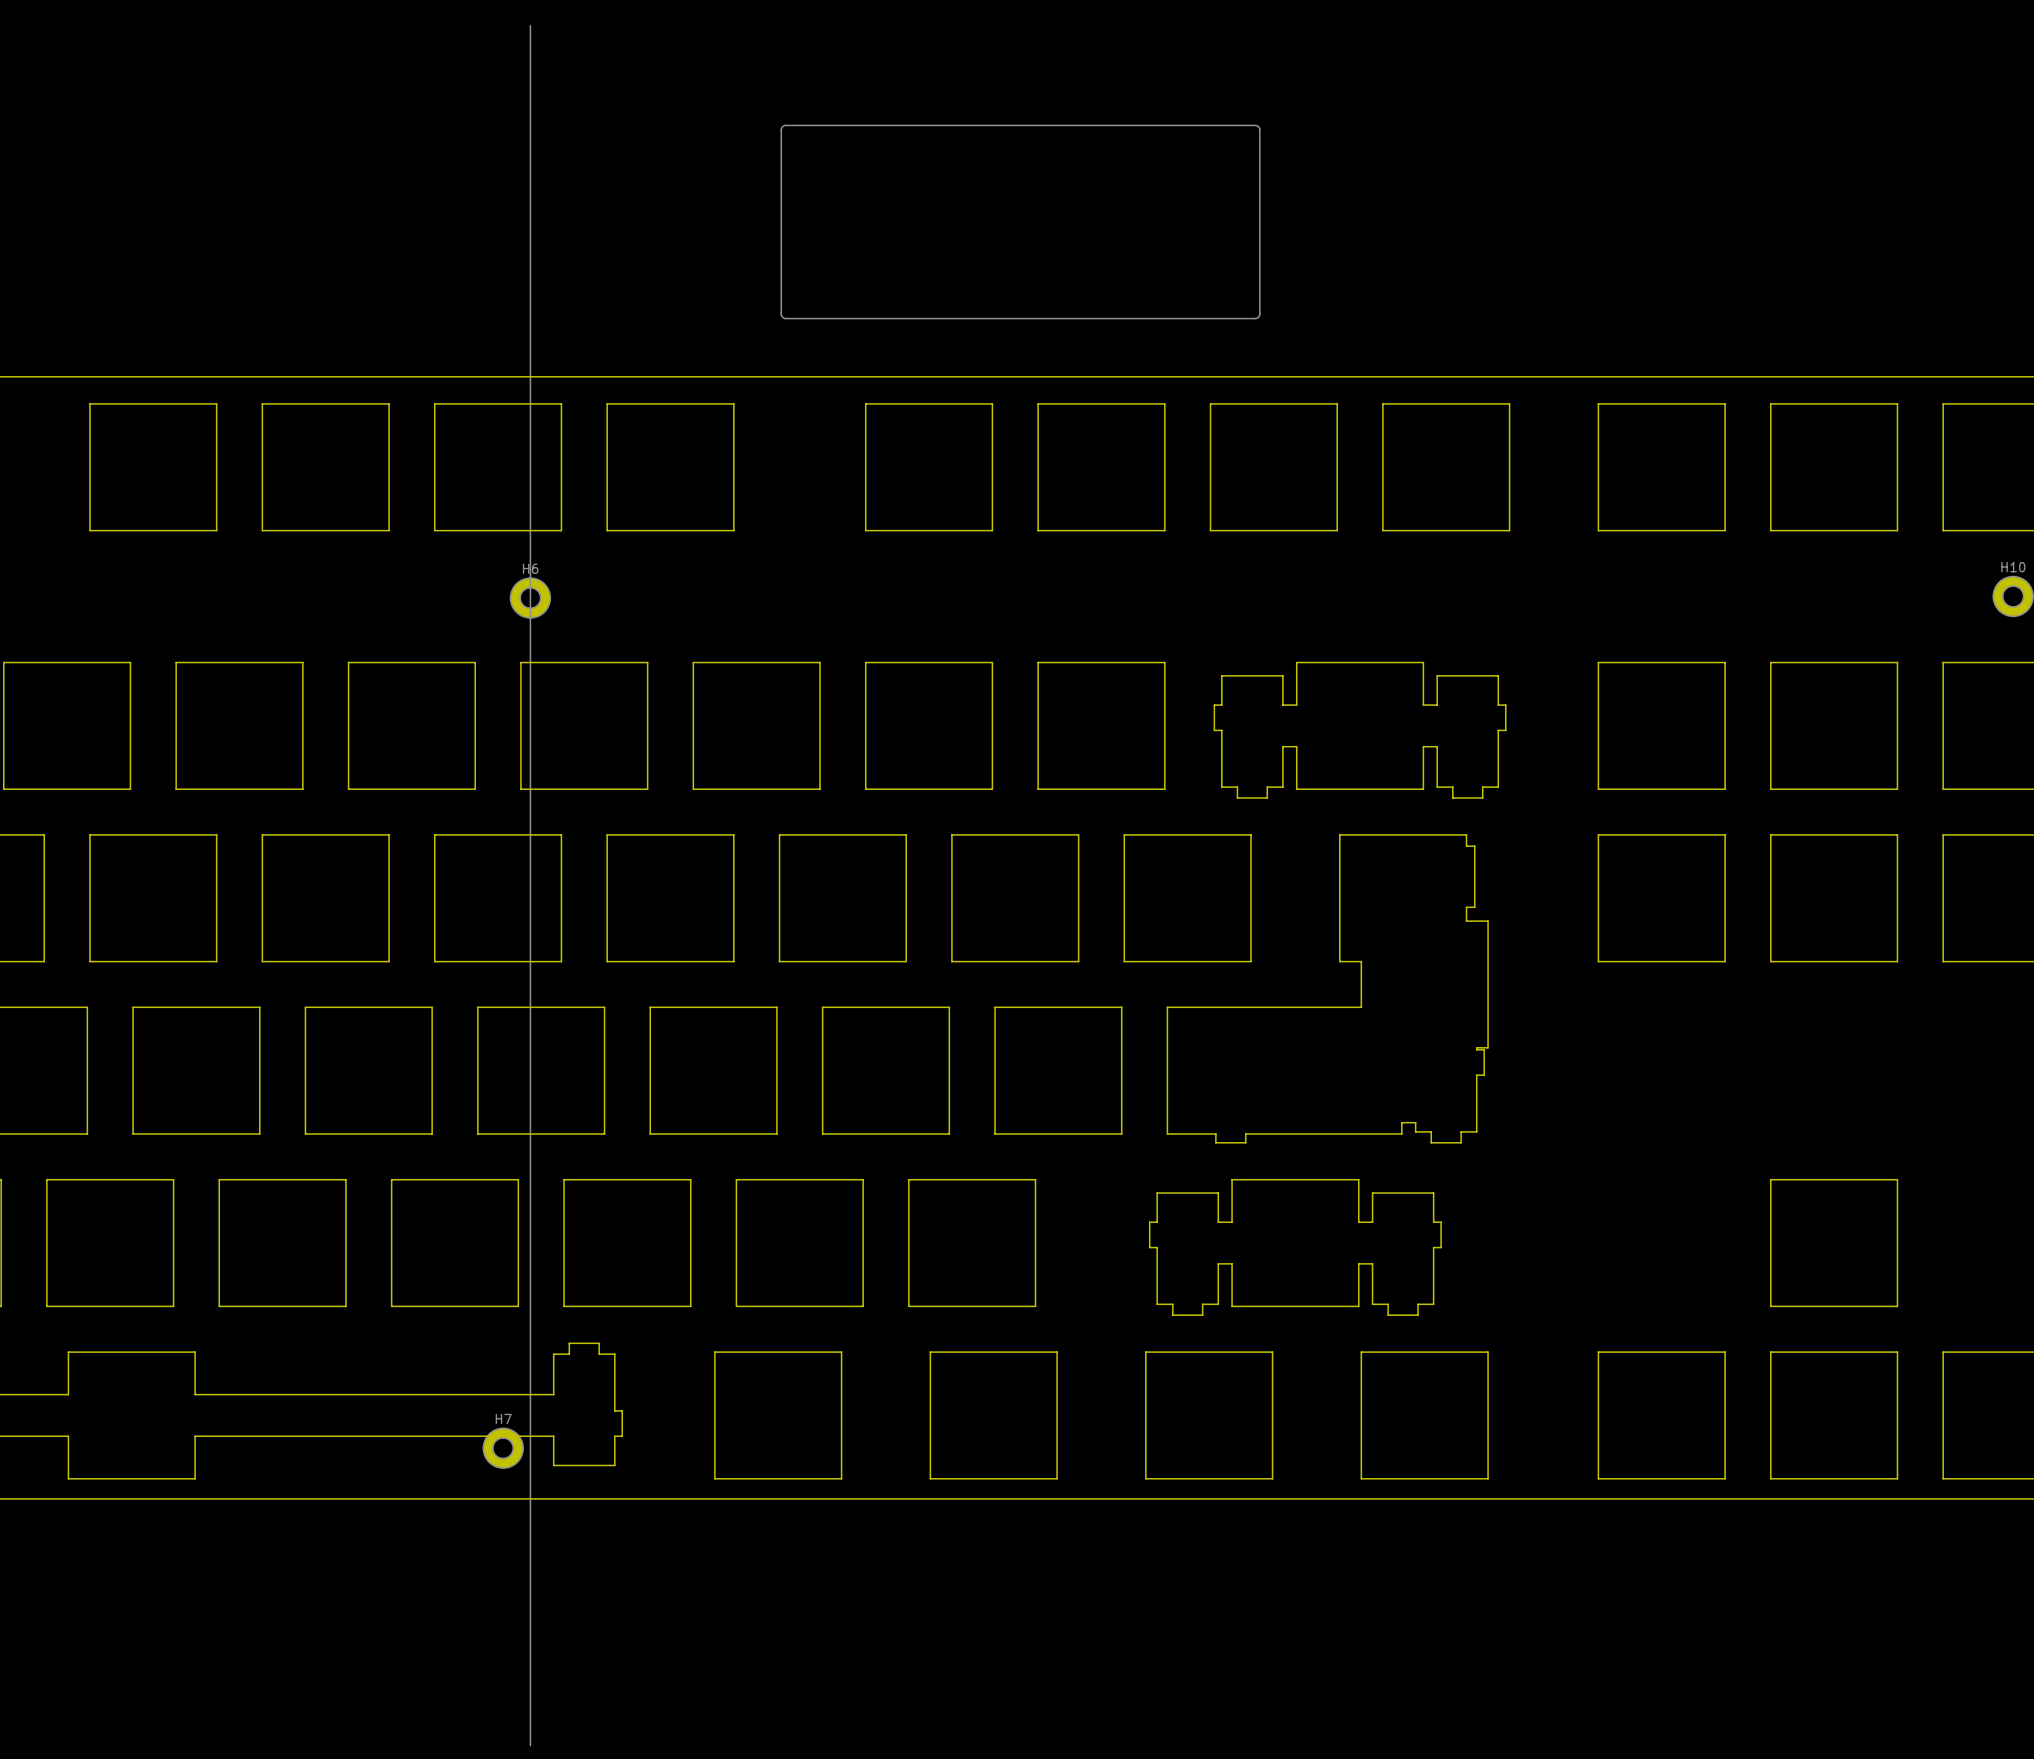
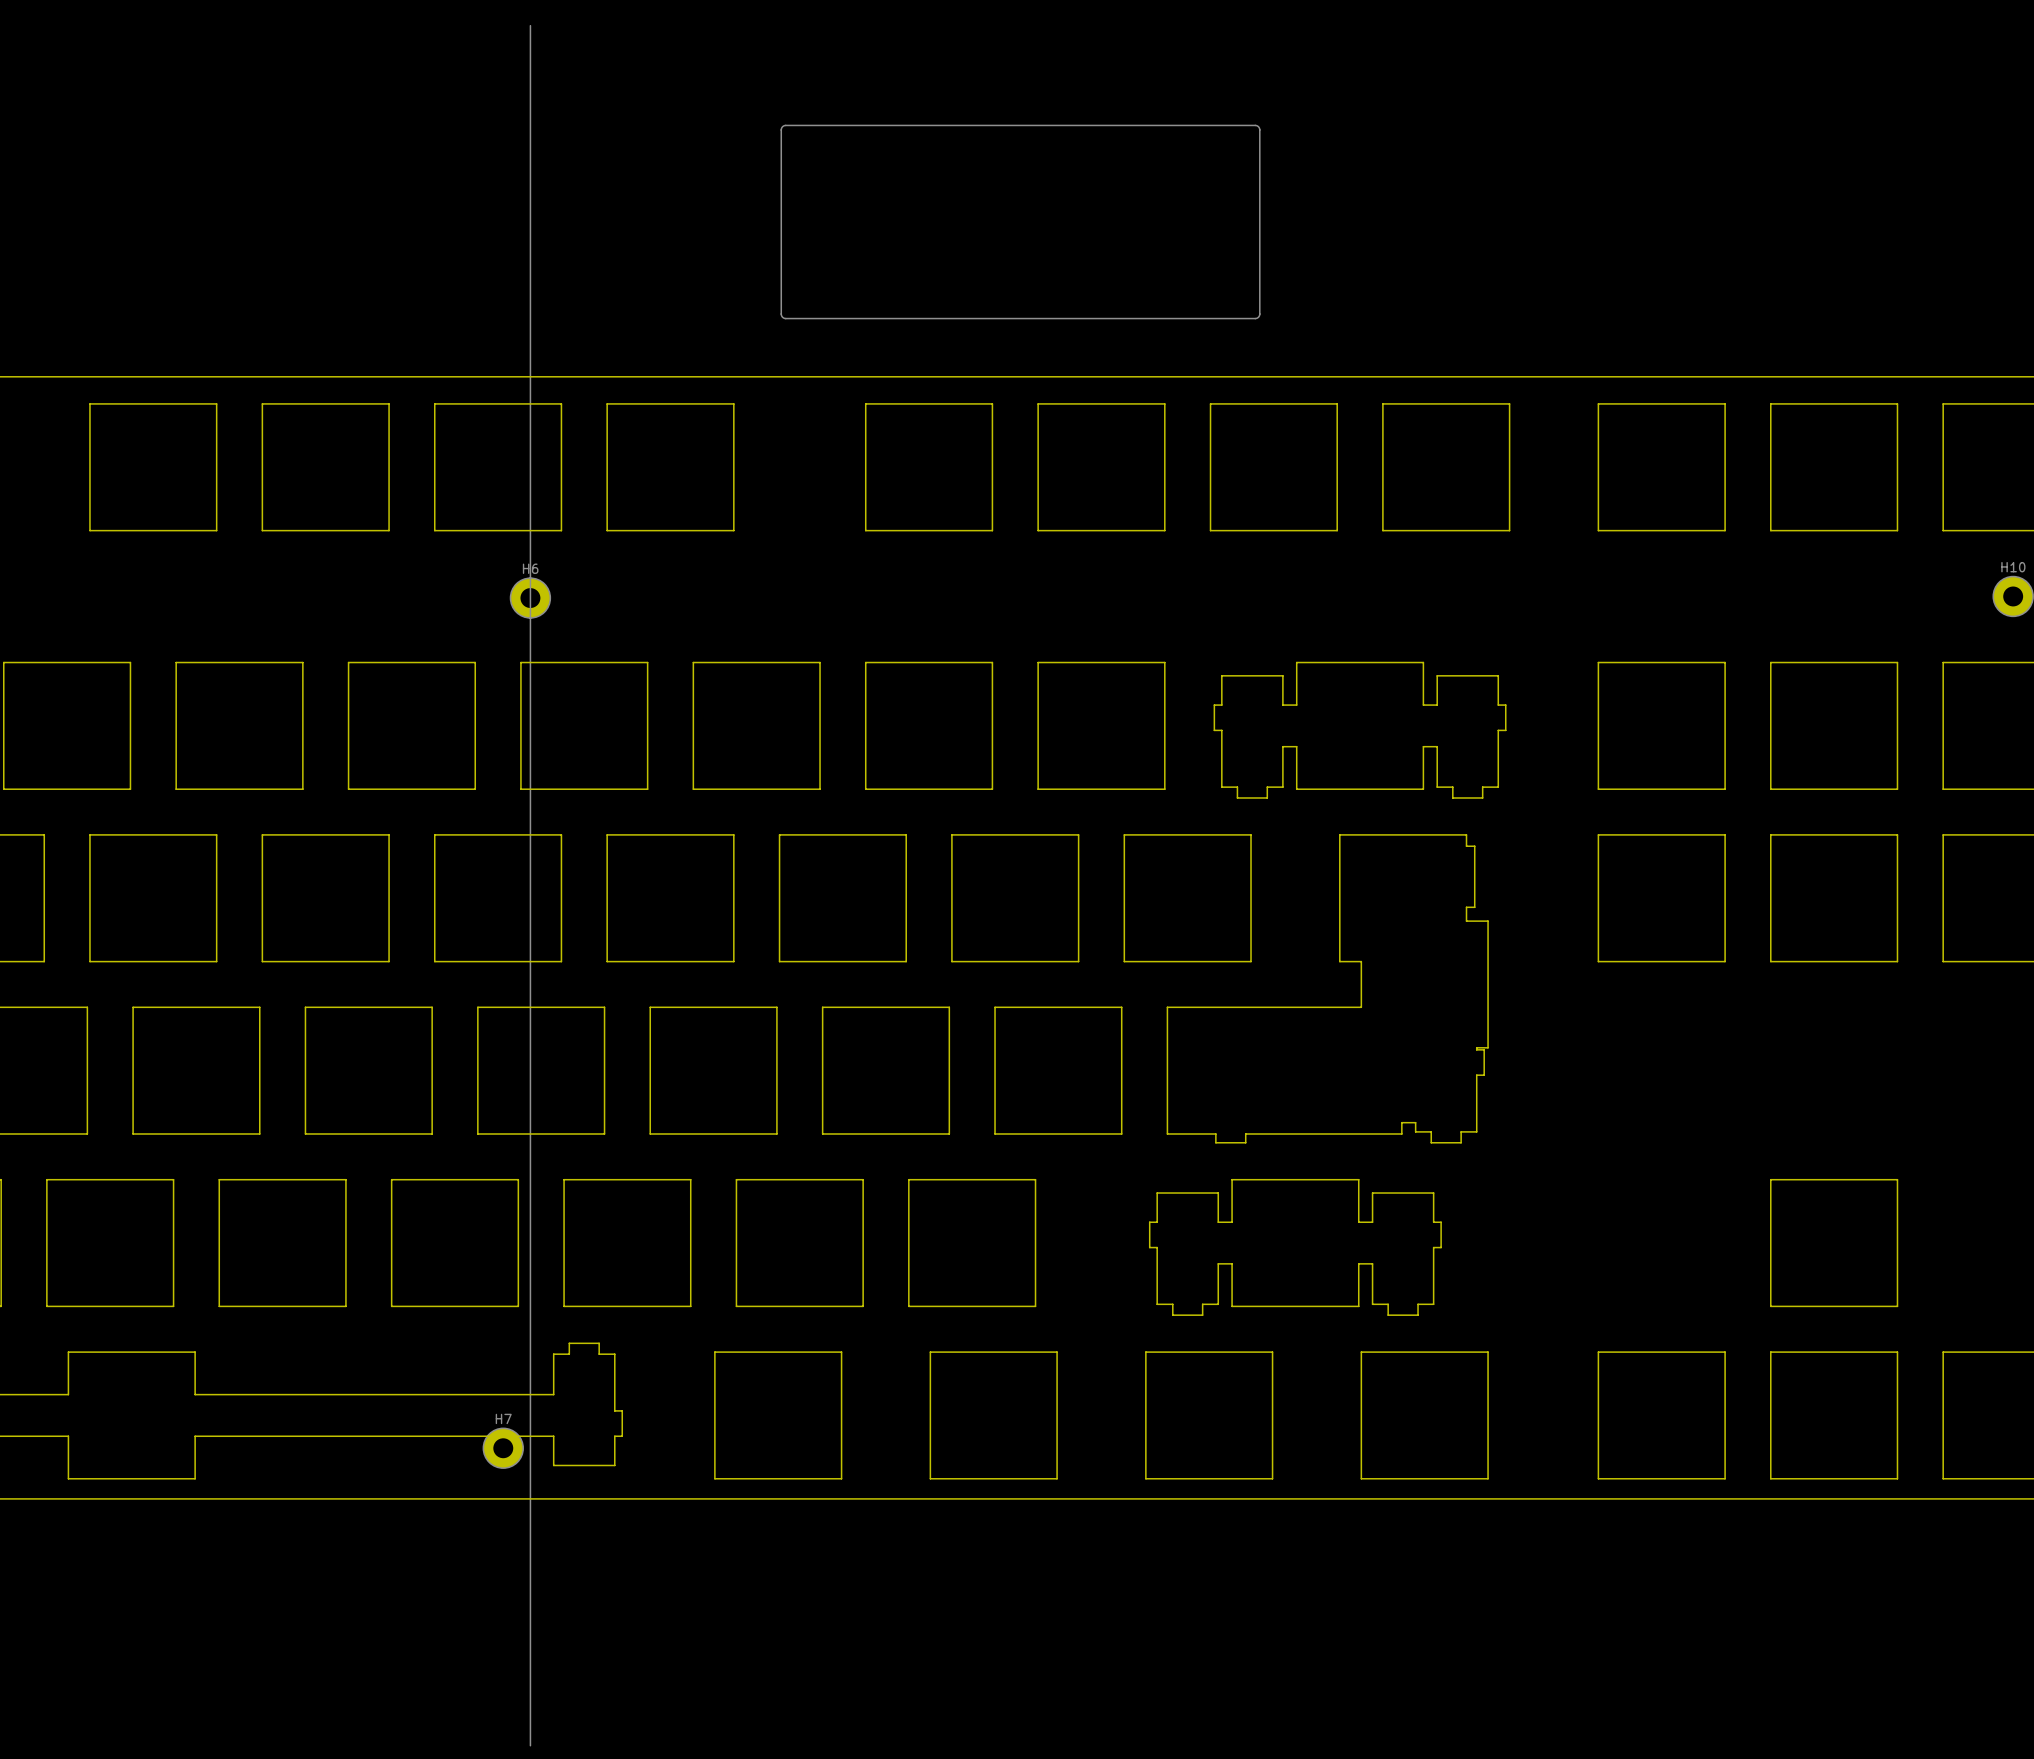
drawing: [2002, 585, 2025, 608] -> none
drawing: [519, 587, 542, 609] -> none
drawing: [492, 1437, 514, 1459] -> none

